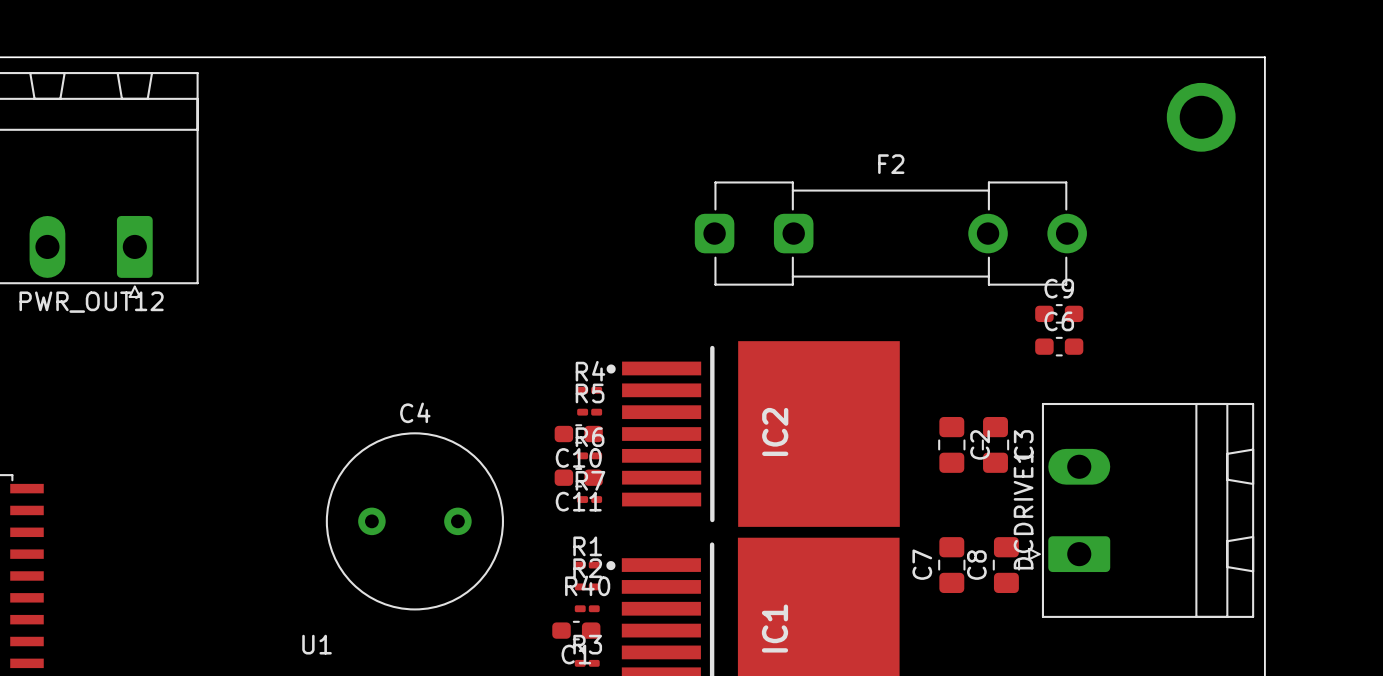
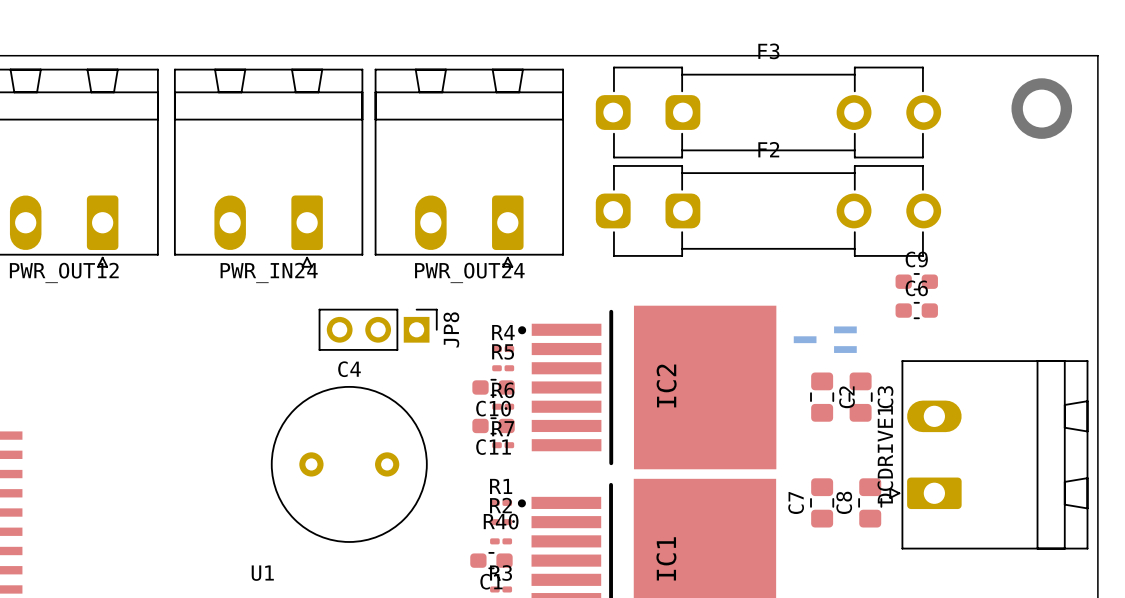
F3: none -> (768, 112)
PWR_IN24: none -> (268, 168)
PWR_OUT24: none -> (469, 168)
JP8: none -> (378, 329)
part: none -> (825, 339)

